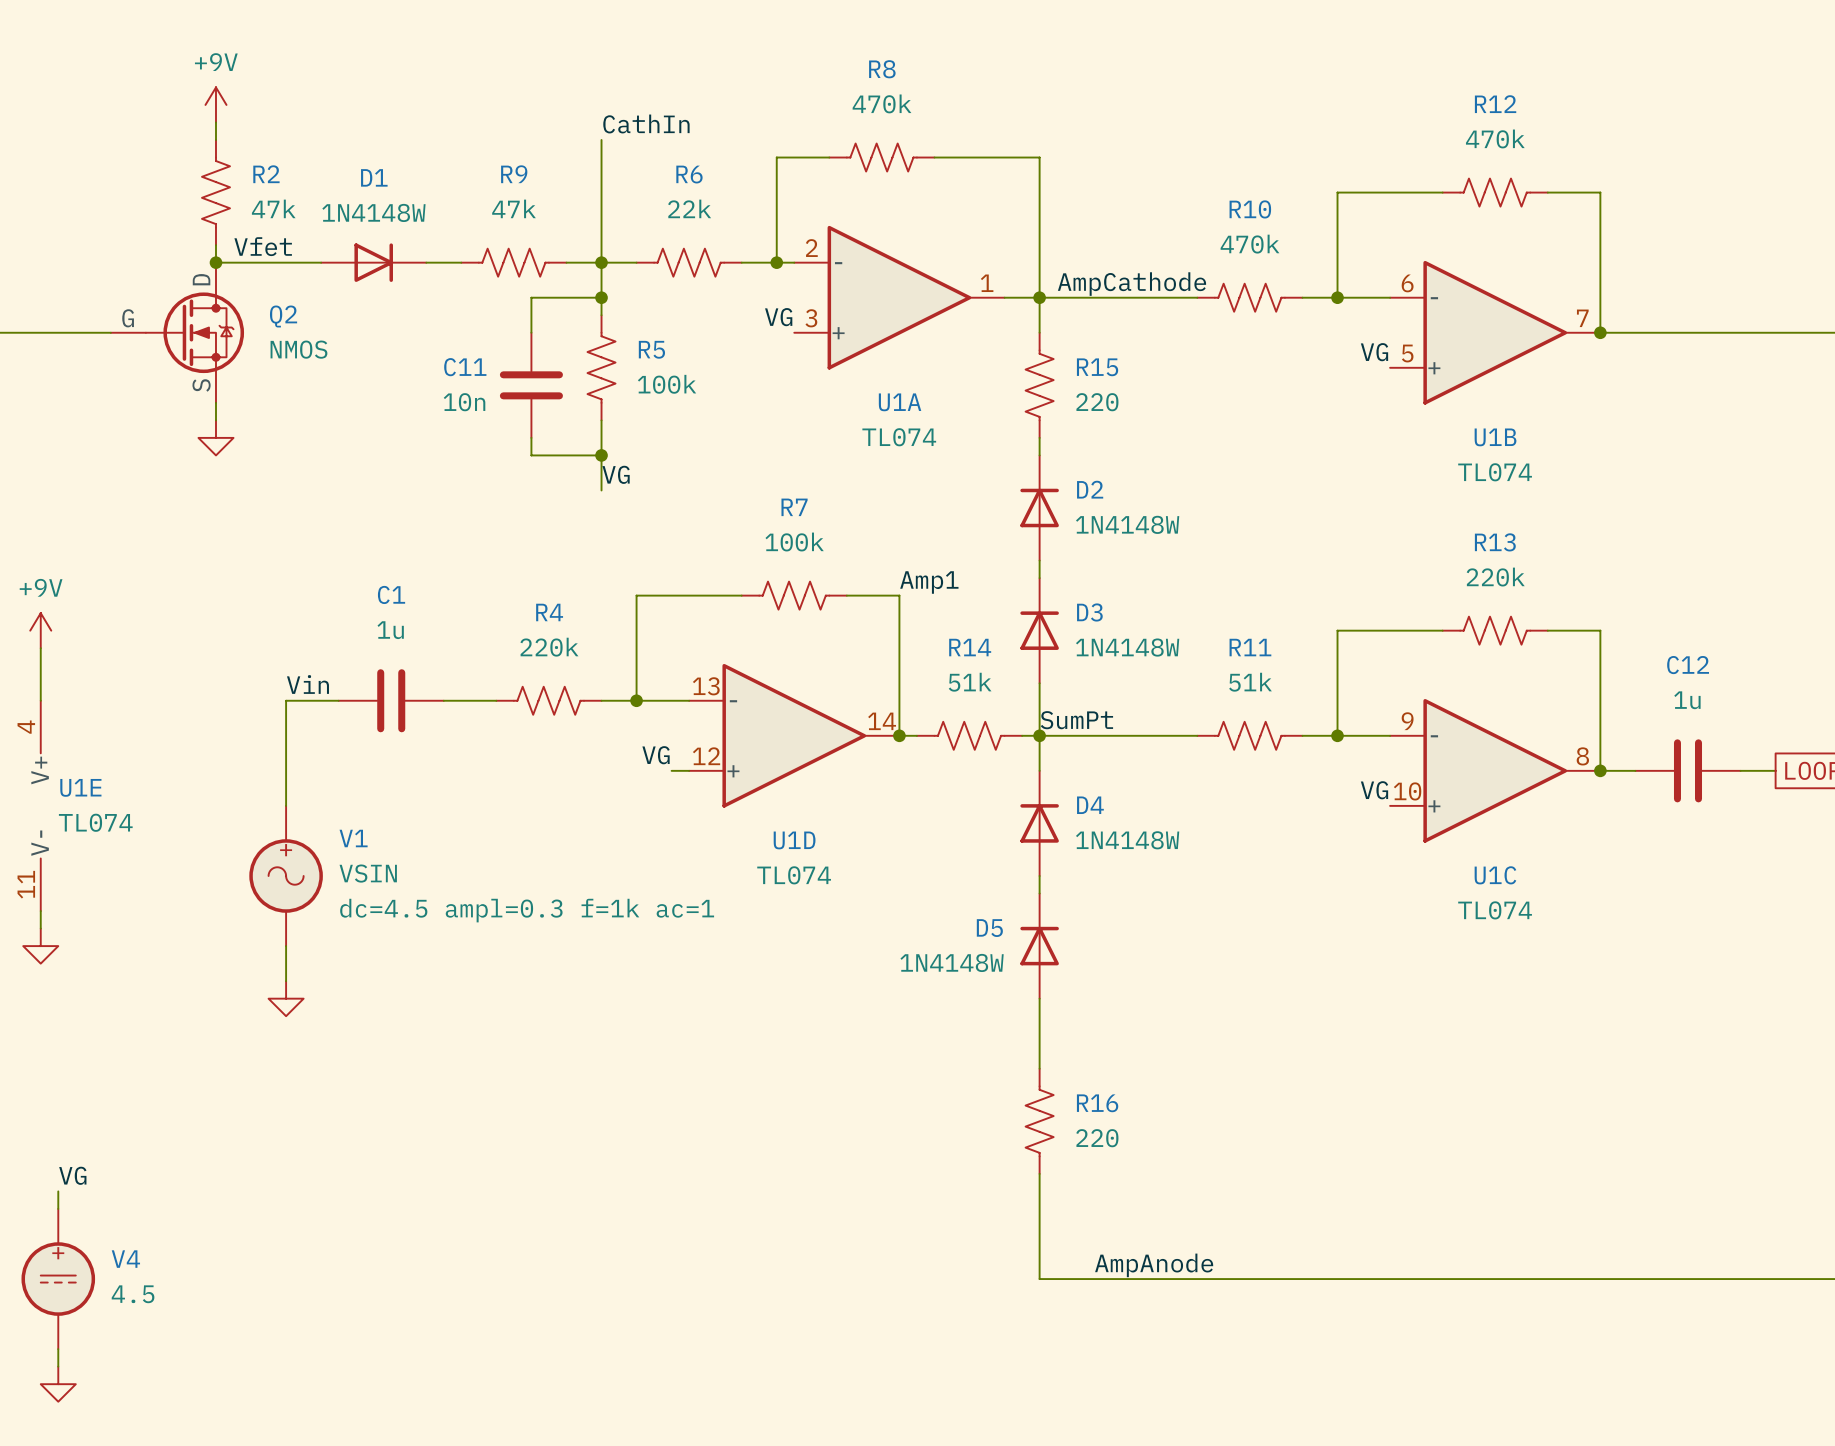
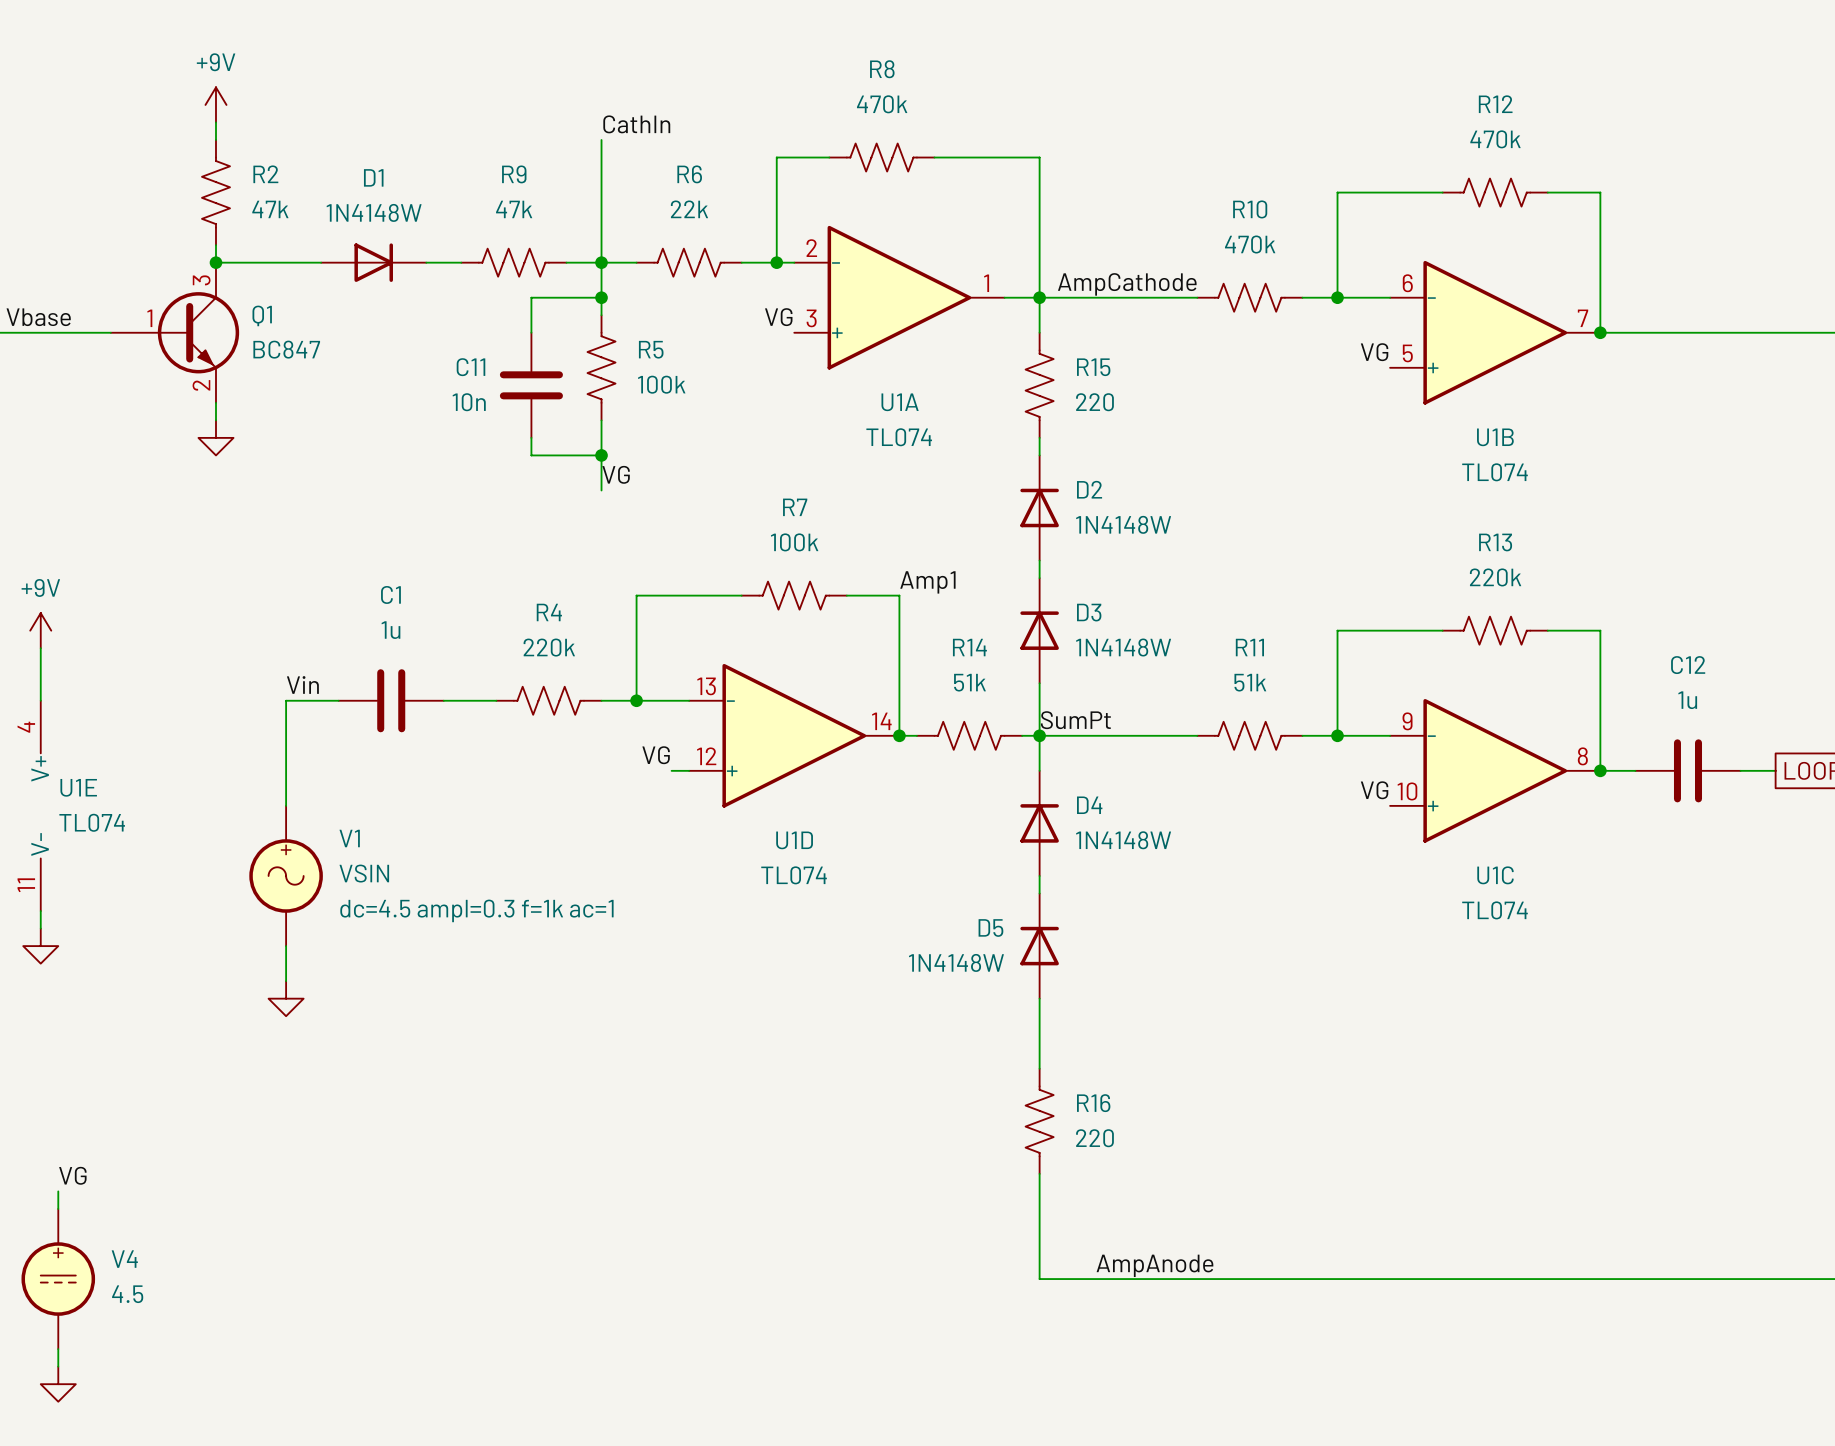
label: Vfet (263, 246) -> none
label: none -> Vbase (38, 317)
Q1: none -> BC847 (174, 332)
Q2: NMOS (177, 332) -> none

